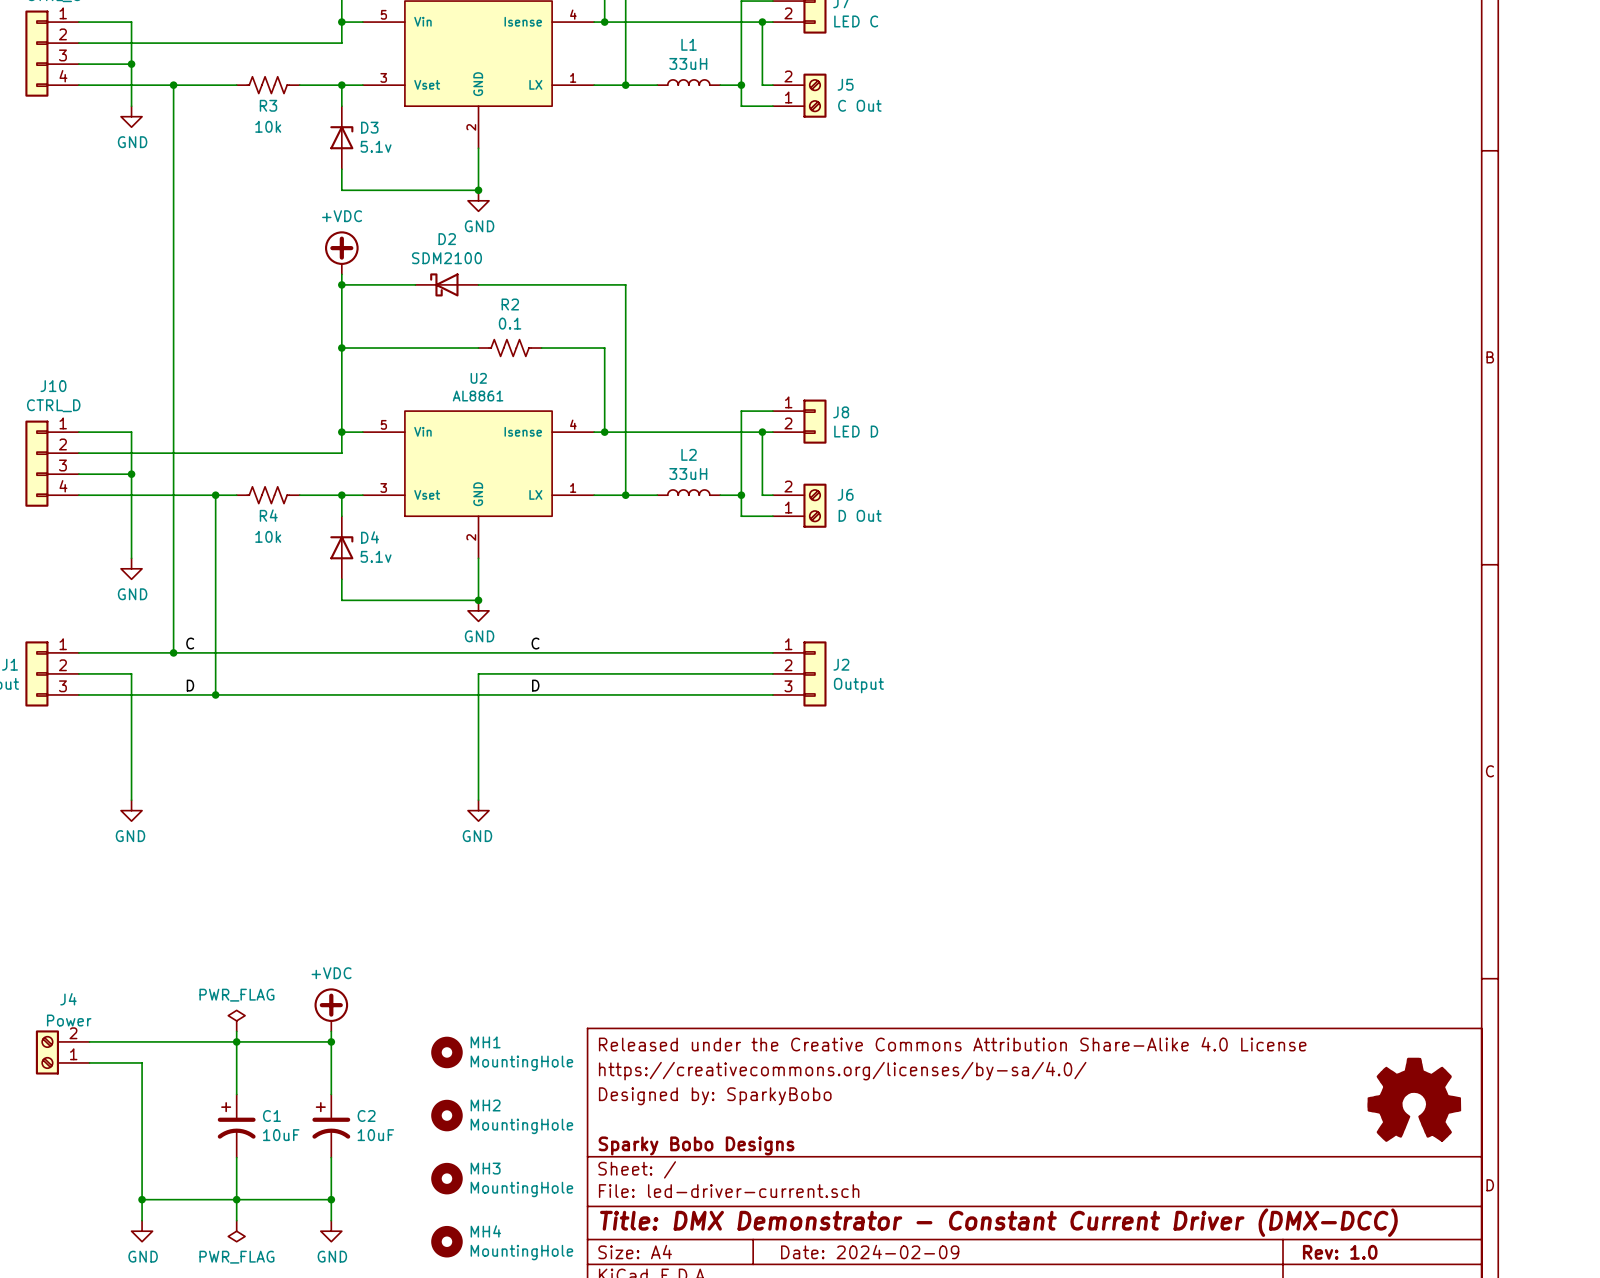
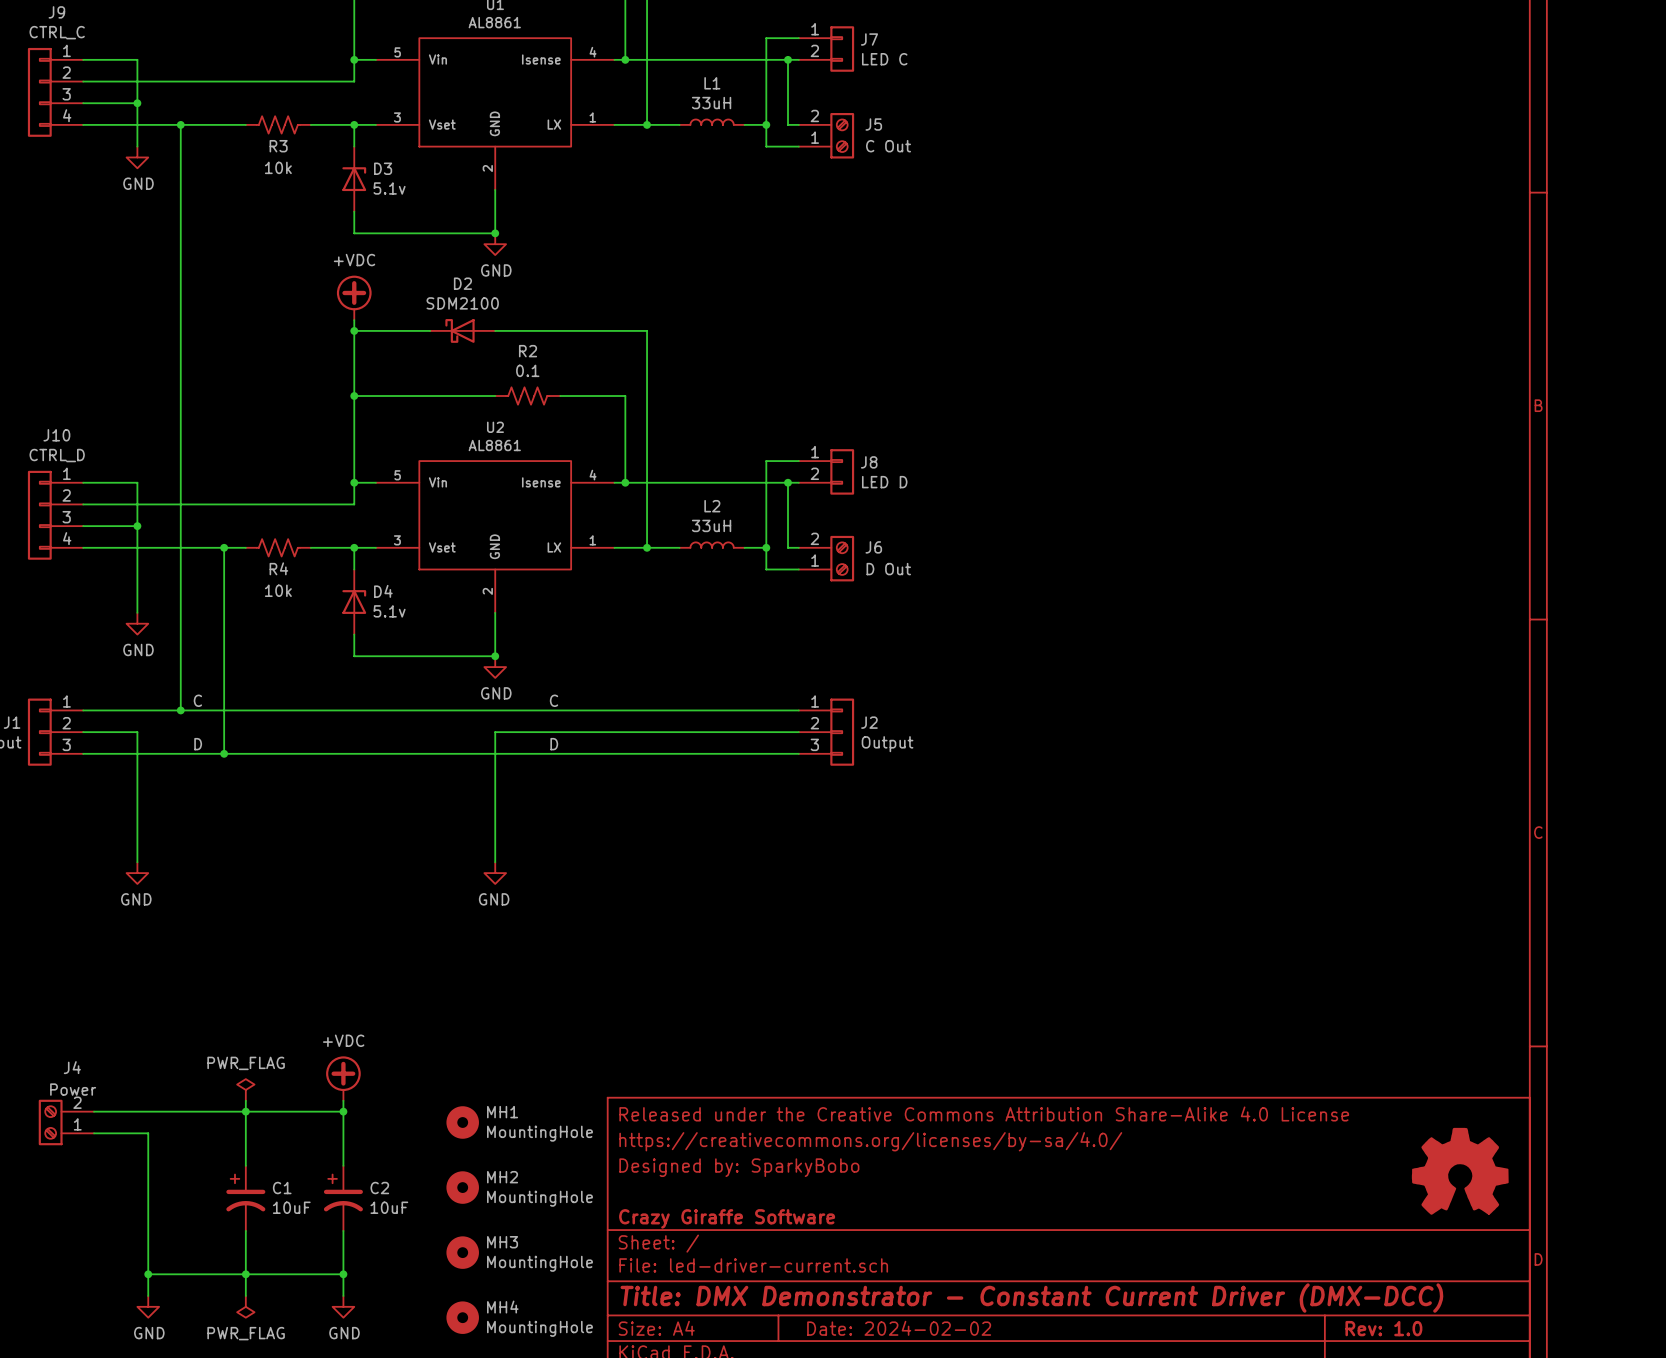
title block: Sparky Bobo Designs (696, 1145) -> Crazy Giraffe Software (727, 1218)
title block: Date: 2024-02-09 (870, 1252) -> Date: 2024-02-02 (899, 1328)

